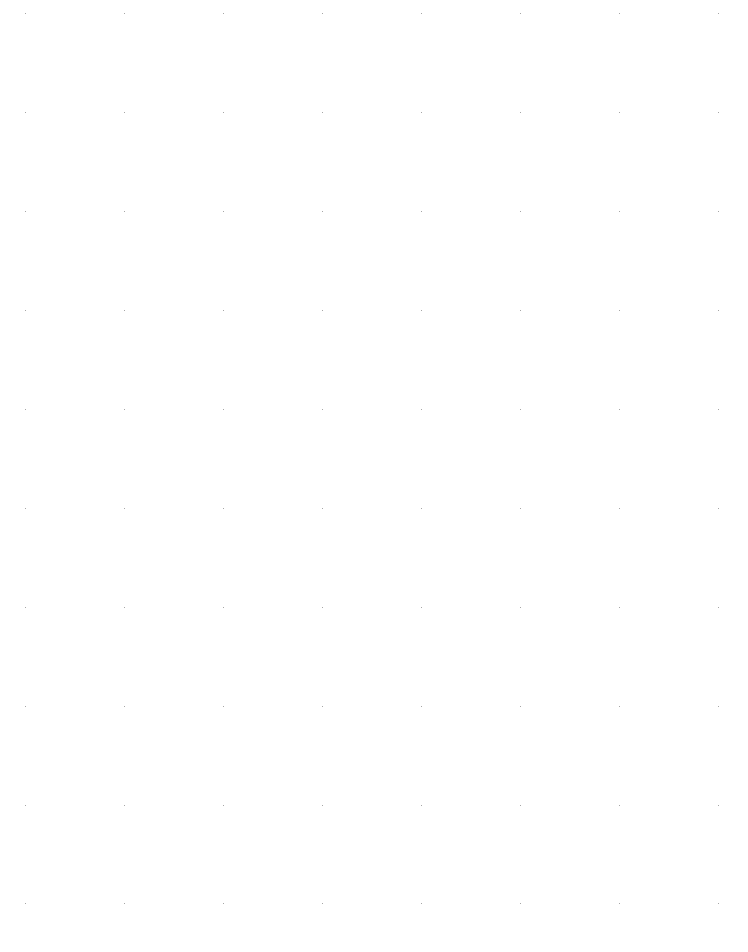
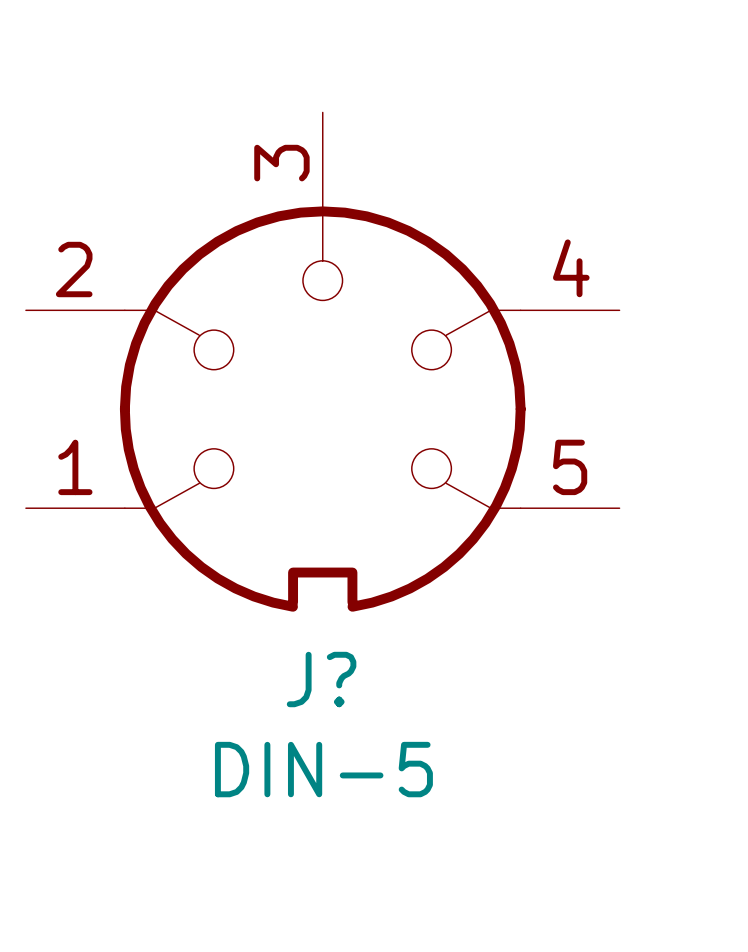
J?: none -> DIN-5 (322, 362)

